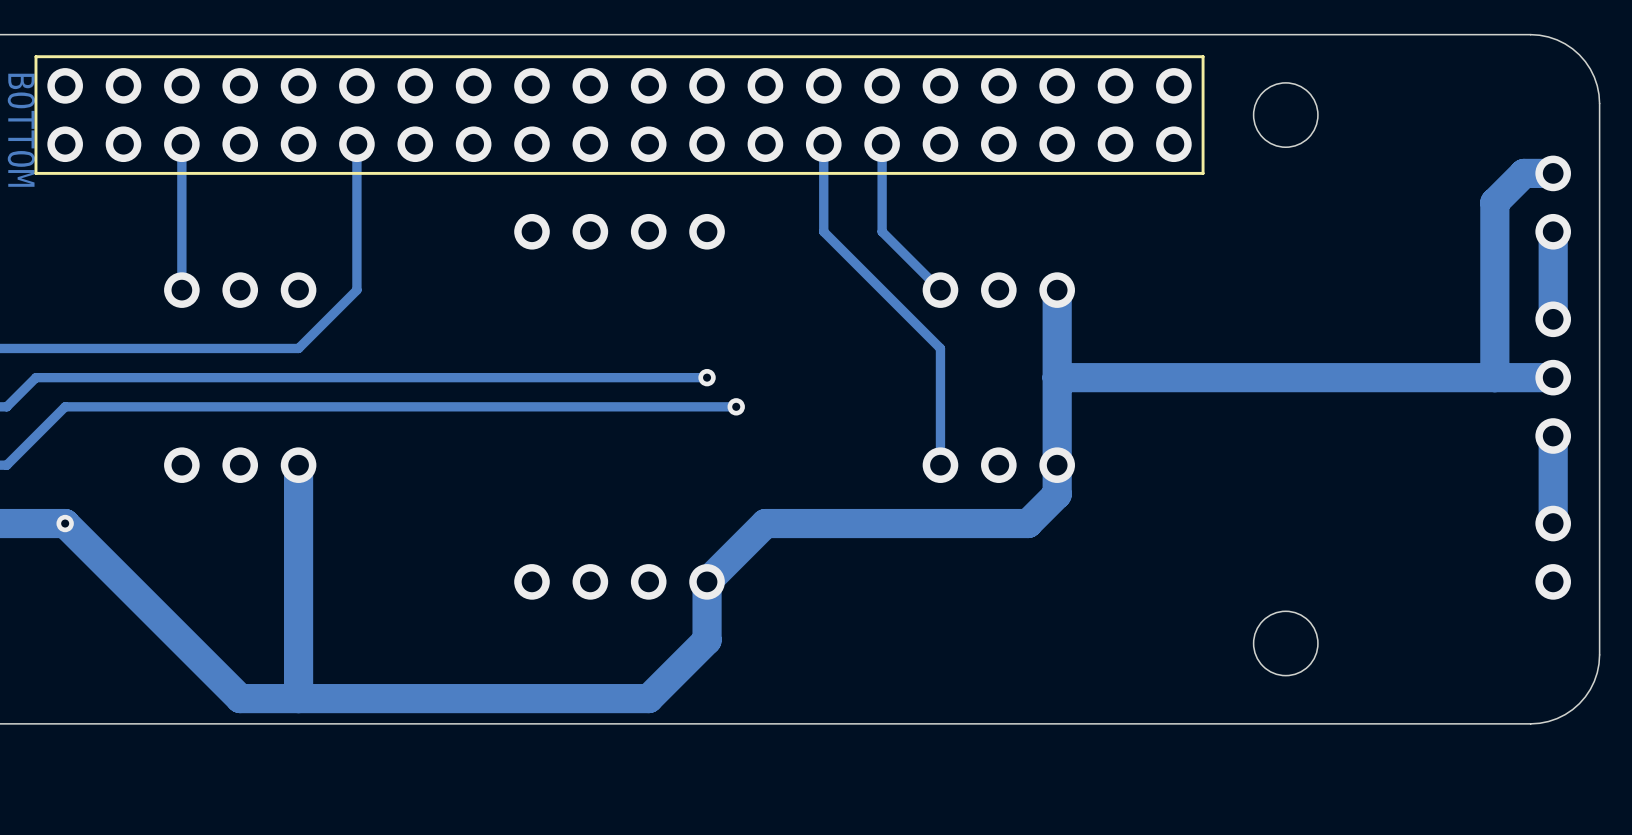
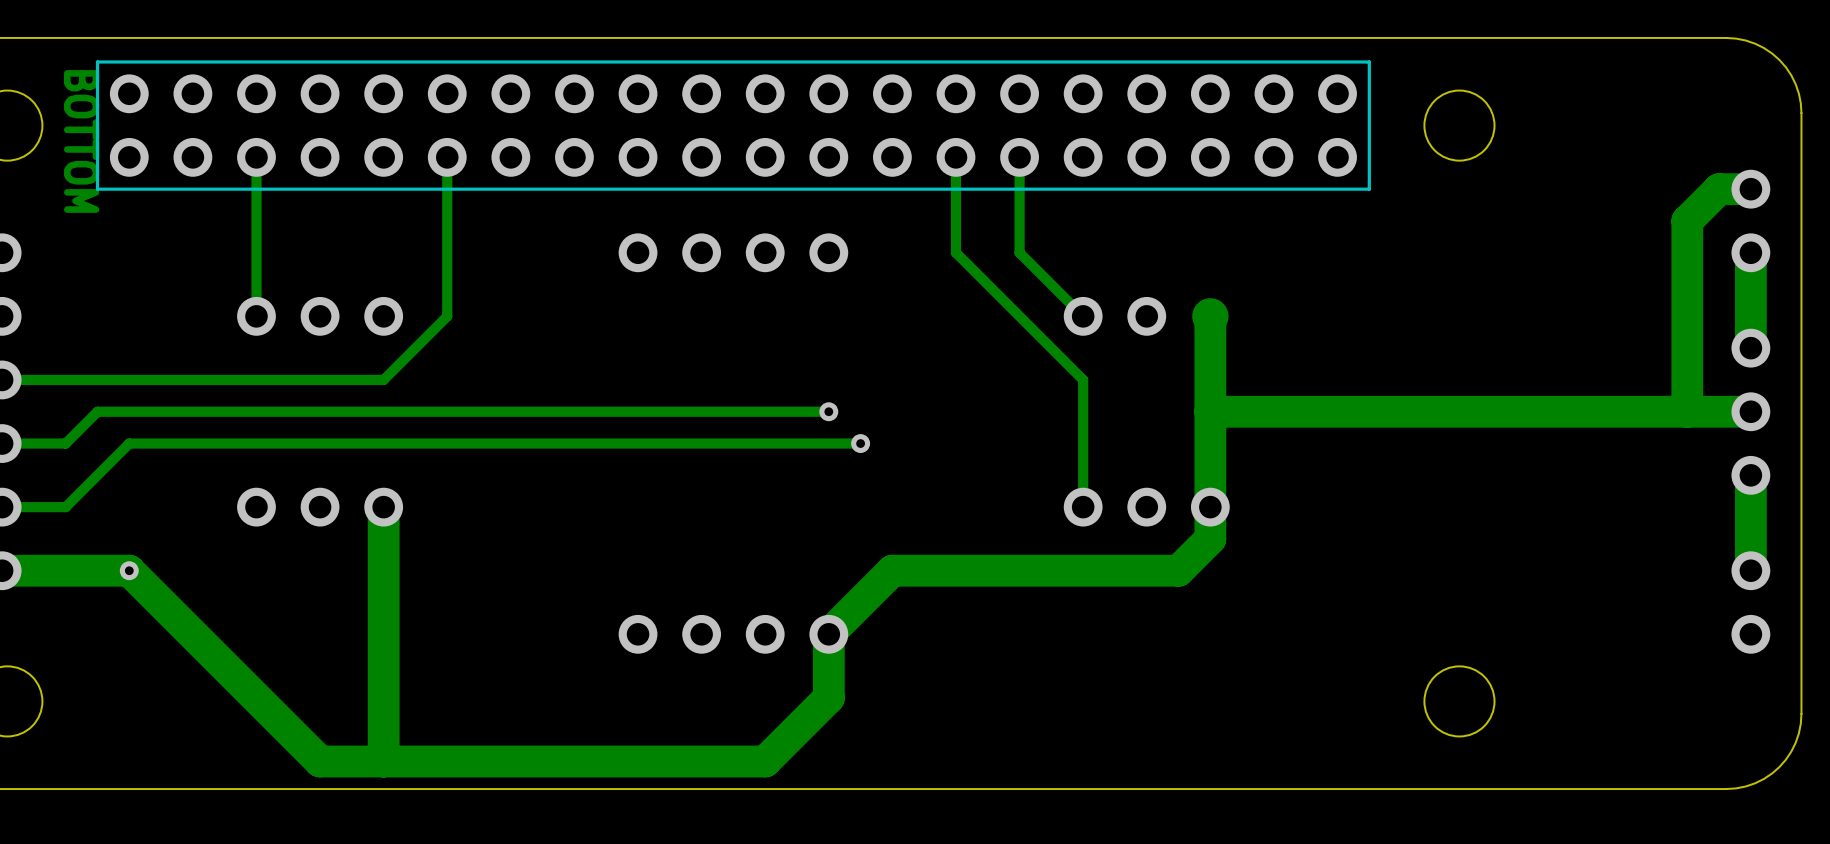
via: (1057, 290) -> none

